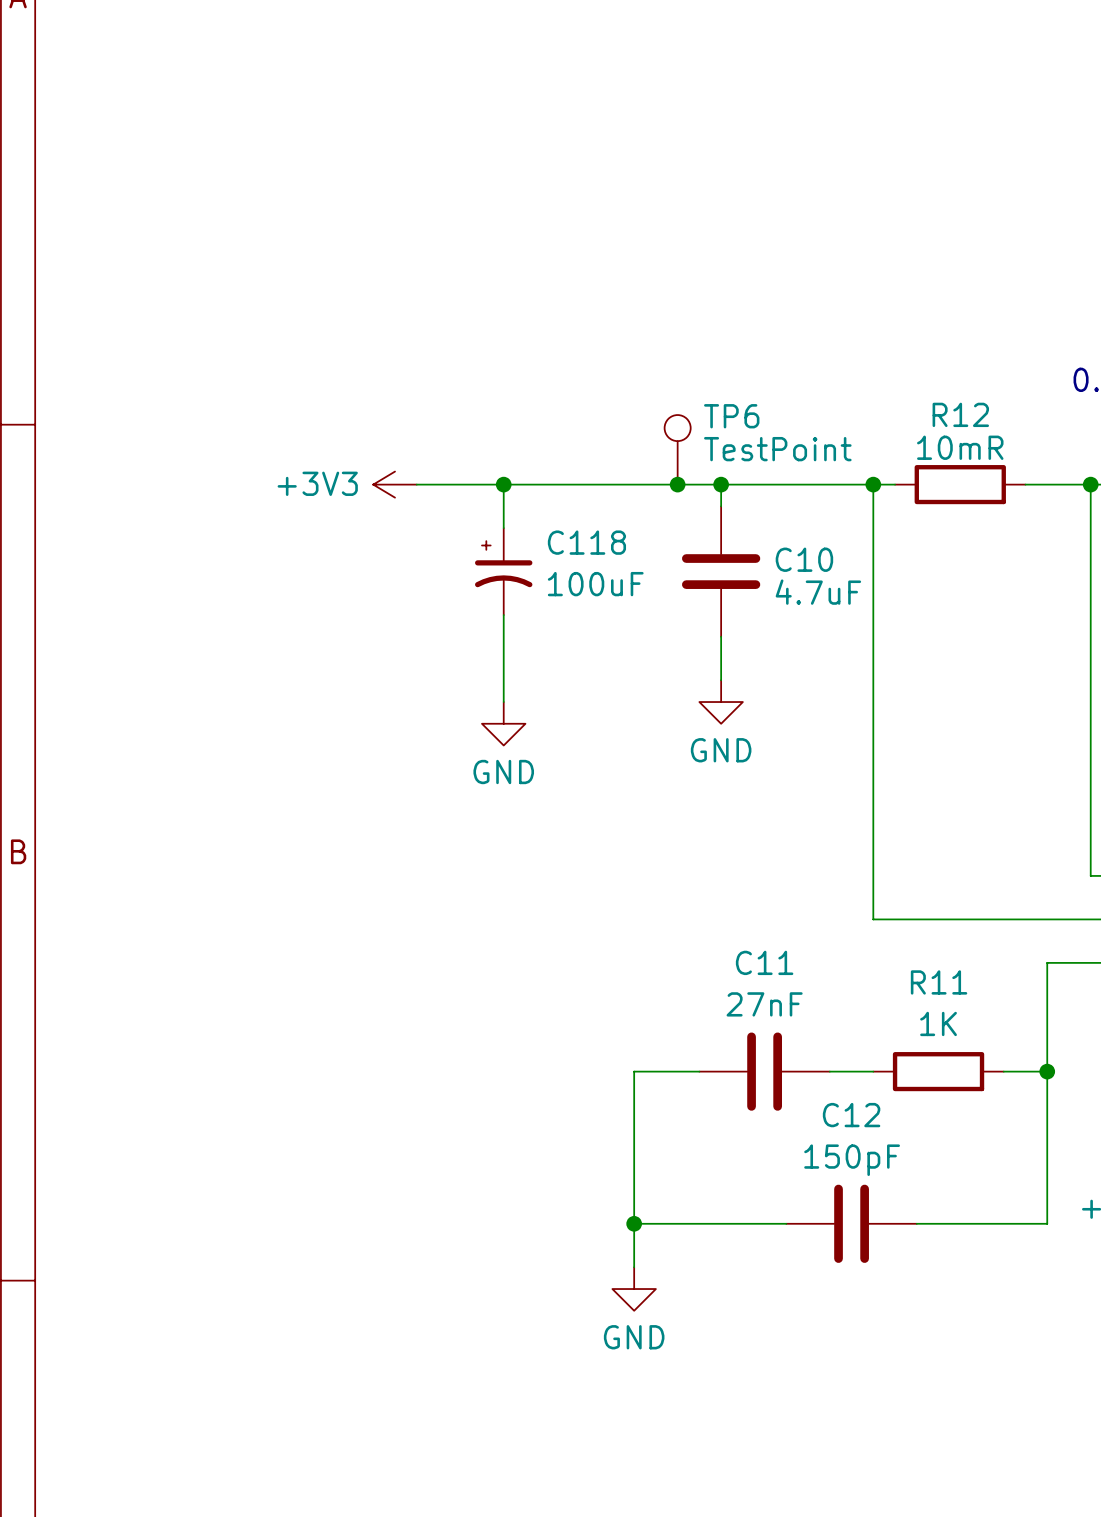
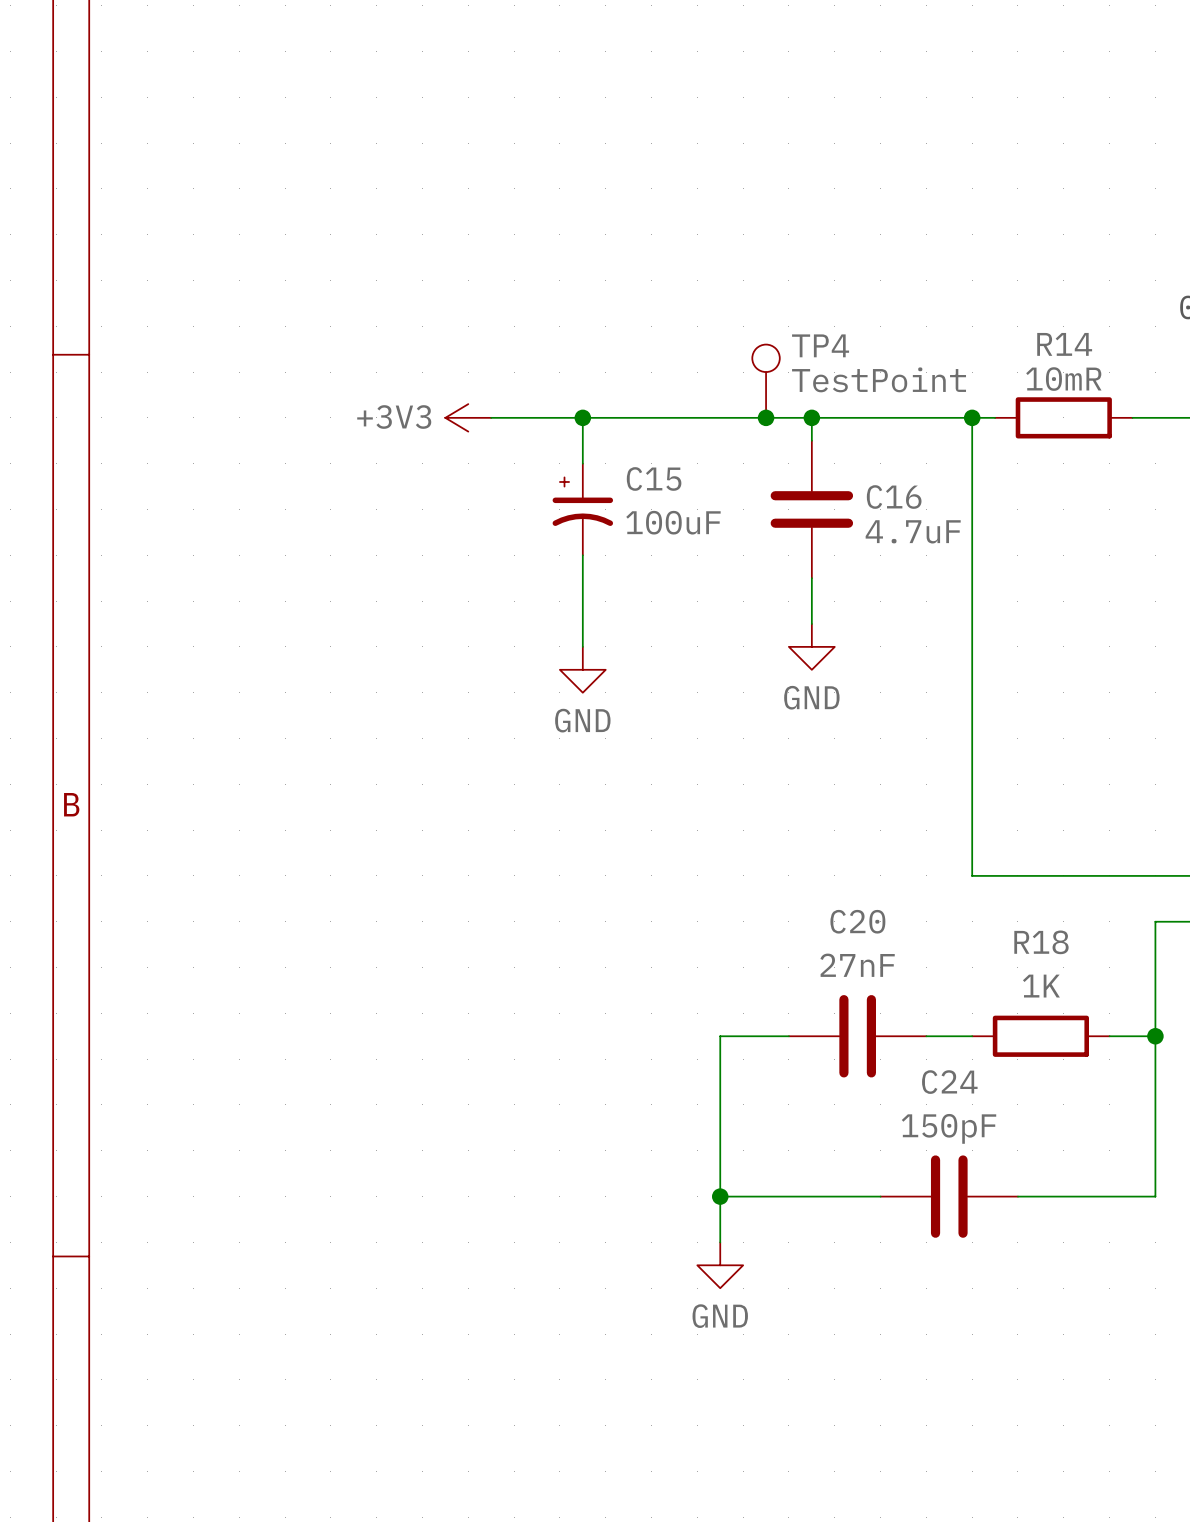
R12 name: R12 (960, 414) -> R14 (1064, 344)
TP6 name: TP6 (731, 416) -> TP4 (820, 345)
C118 name: C118 (586, 542) -> C15 (654, 478)
C10 name: C10 (804, 559) -> C16 (894, 497)
C11 name: C11 (764, 962) -> C20 (857, 921)
R11 name: R11 (939, 982) -> R18 (1041, 942)
C12 name: C12 (851, 1115) -> C24 (949, 1082)

